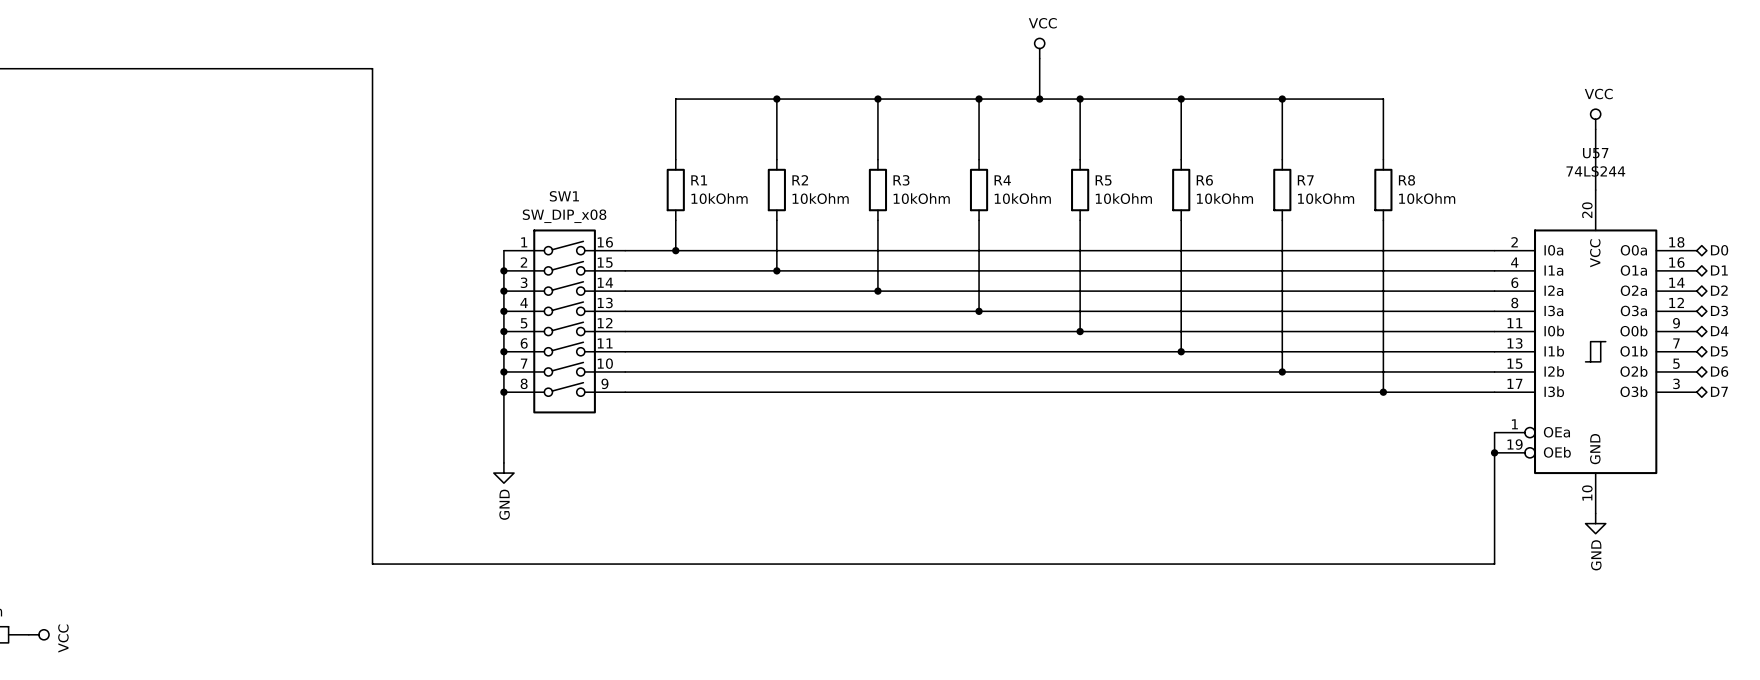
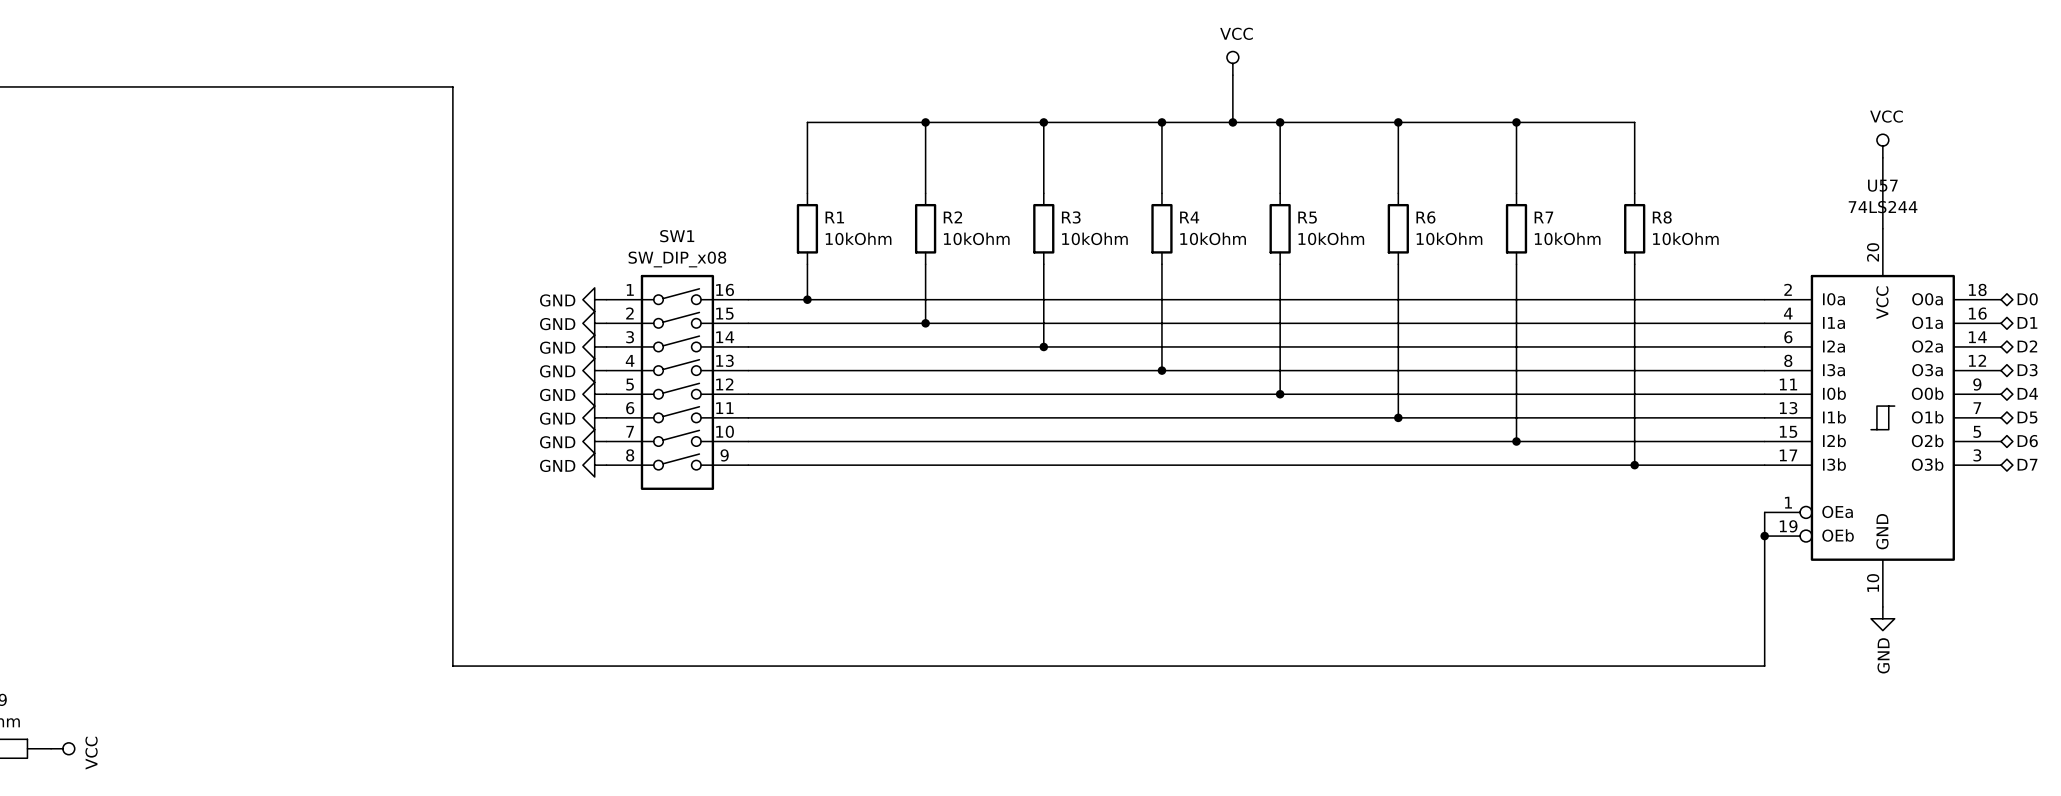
power symbol: none -> GND (594, 299)
wire: (503, 250) (503, 462) -> none
power symbol: none -> GND (594, 323)
junction: (503, 270) -> none
power symbol: none -> GND (594, 346)
junction: (503, 291) -> none
power symbol: none -> GND (594, 370)
junction: (503, 311) -> none
power symbol: none -> GND (594, 394)
junction: (503, 331) -> none
power symbol: none -> GND (594, 417)
junction: (503, 351) -> none
power symbol: none -> GND (594, 441)
junction: (503, 371) -> none
power symbol: none -> GND (594, 465)
junction: (503, 392) -> none
power symbol: GND (503, 473) -> none

